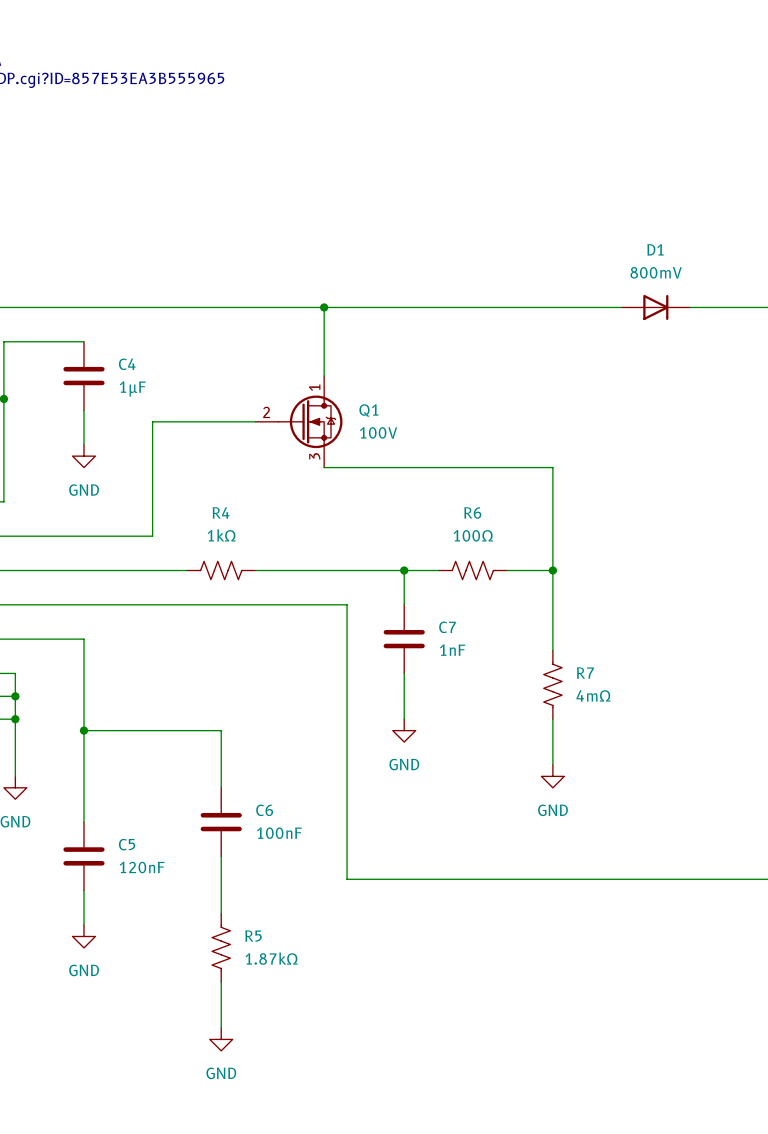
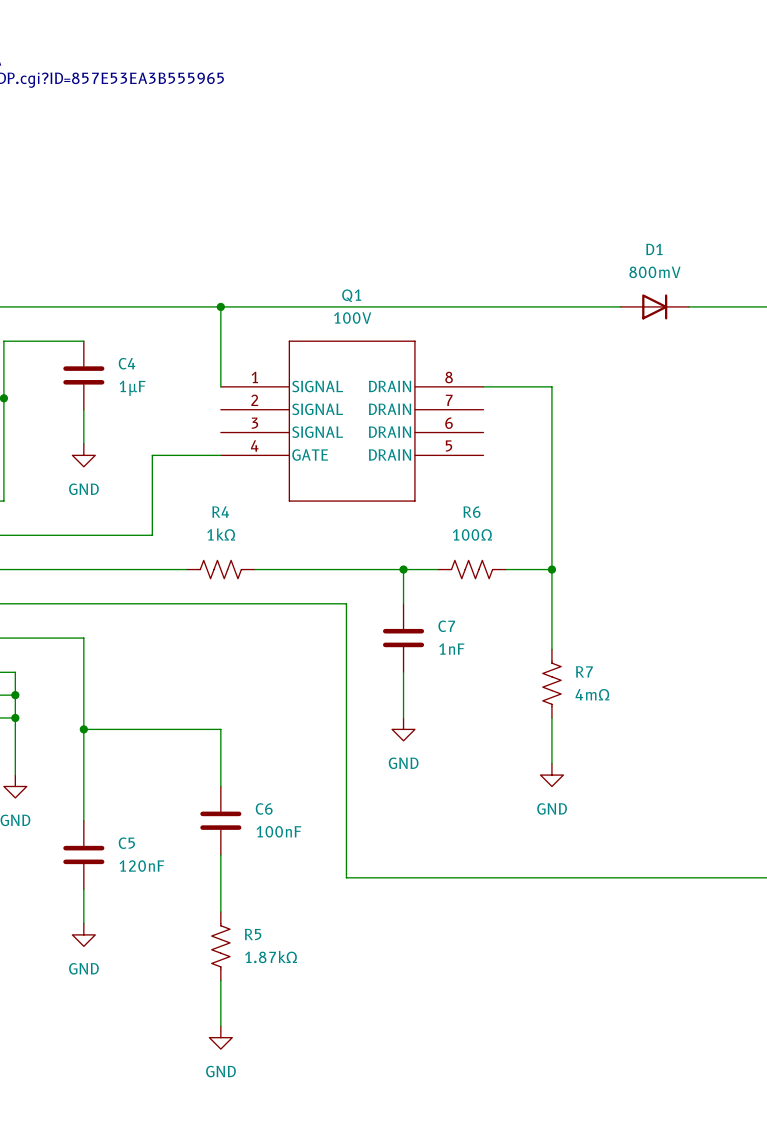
wire: none -> (220, 306) (220, 386)
junction: none -> (220, 306)
wire: (324, 307) (324, 376) -> none
junction: (324, 307) -> none
Q1 symbol: [255, 376, 343, 468] -> [220, 340, 484, 502]
Q1 name position: Q1 (368, 410) -> Q1 (351, 295)
wire: (255, 421) (152, 421) (152, 456) -> (220, 455) (152, 455)
Q1 value position: 100V (378, 432) -> 100V (352, 318)
wire: (324, 467) (552, 467) -> (483, 386) (551, 386) (551, 466)

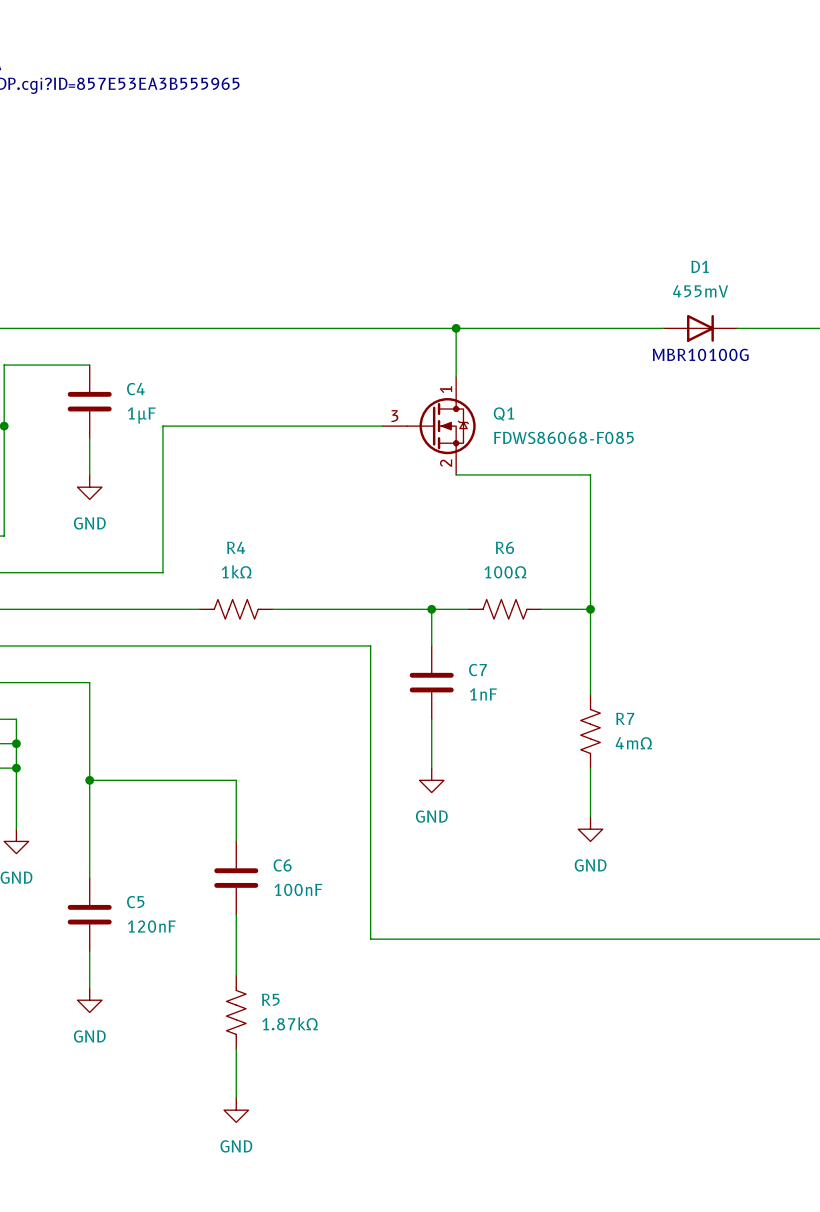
D1 value: 800mV (654, 272) -> 455mV (700, 291)
Q1 name position: Q1 (351, 295) -> Q1 (503, 414)
wire: (220, 306) (220, 386) -> none
junction: (220, 306) -> none
wire: none -> (456, 328) (456, 377)
junction: none -> (456, 328)
Q1 value: 100V (352, 318) -> FDWS86068-F085 (563, 437)
text: none -> MBR10100G (700, 354)
Q1 symbol: [220, 340, 484, 502] -> [382, 377, 476, 475]
wire: (483, 386) (551, 386) (551, 443) -> (456, 474) (590, 474)
wire: (152, 455) (220, 455) -> (162, 487) (162, 426) (382, 426)

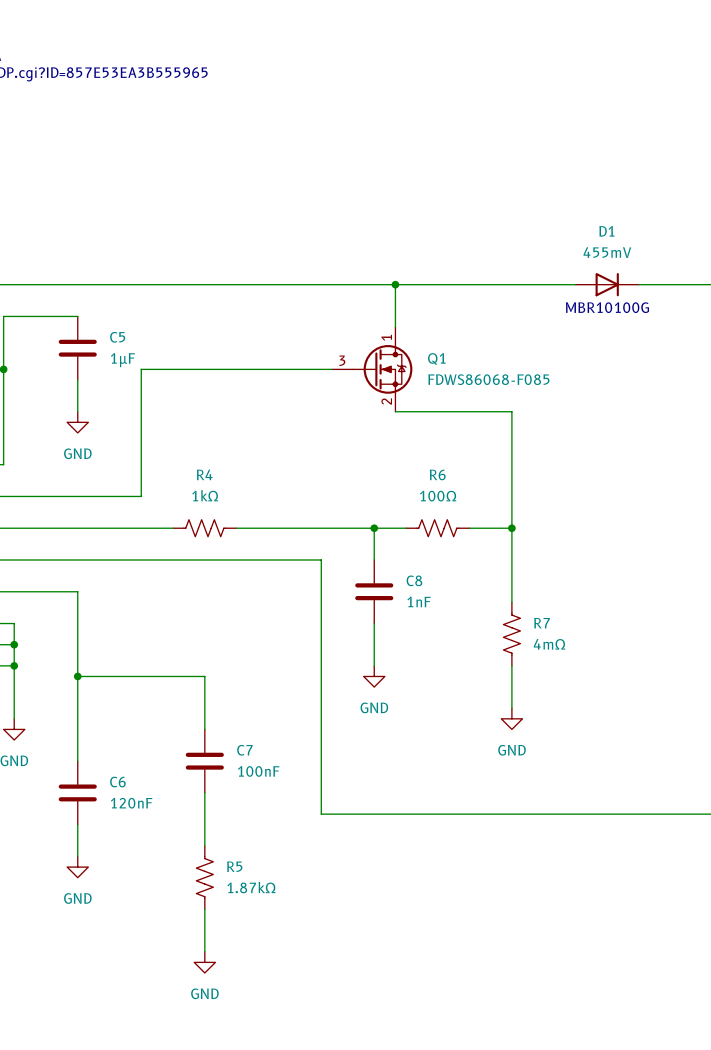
C4 name: C4 (135, 389) -> C5 (117, 337)
C7 name: C7 (477, 670) -> C8 (414, 580)
C6 name: C6 (282, 865) -> C7 (244, 750)
C5 name: C5 (135, 902) -> C6 (117, 782)

